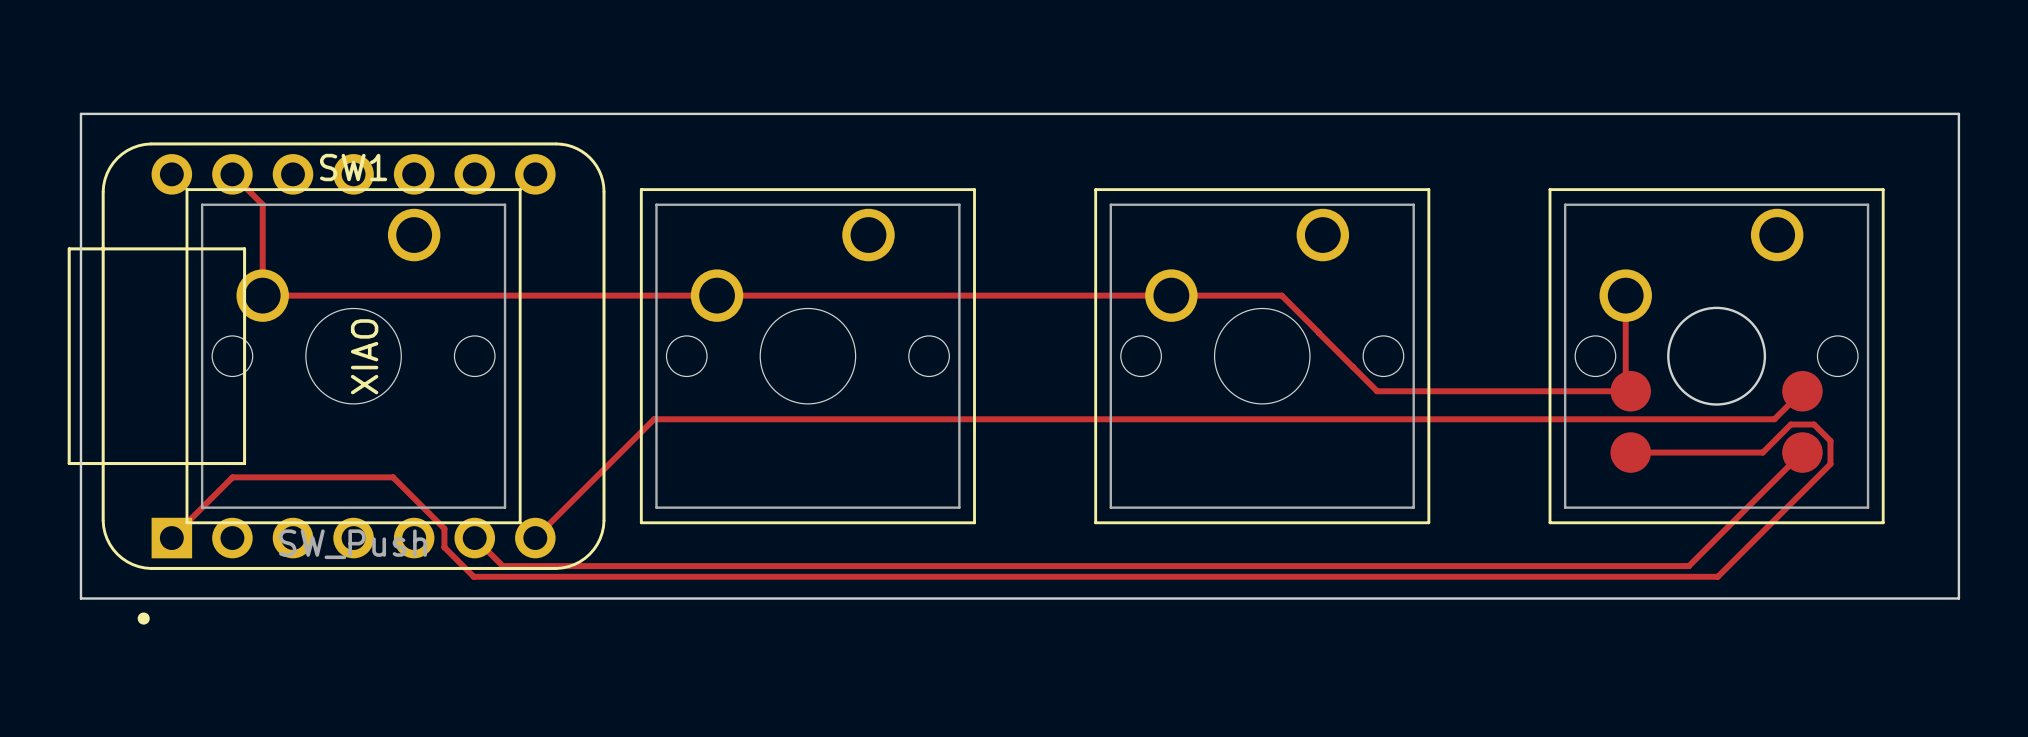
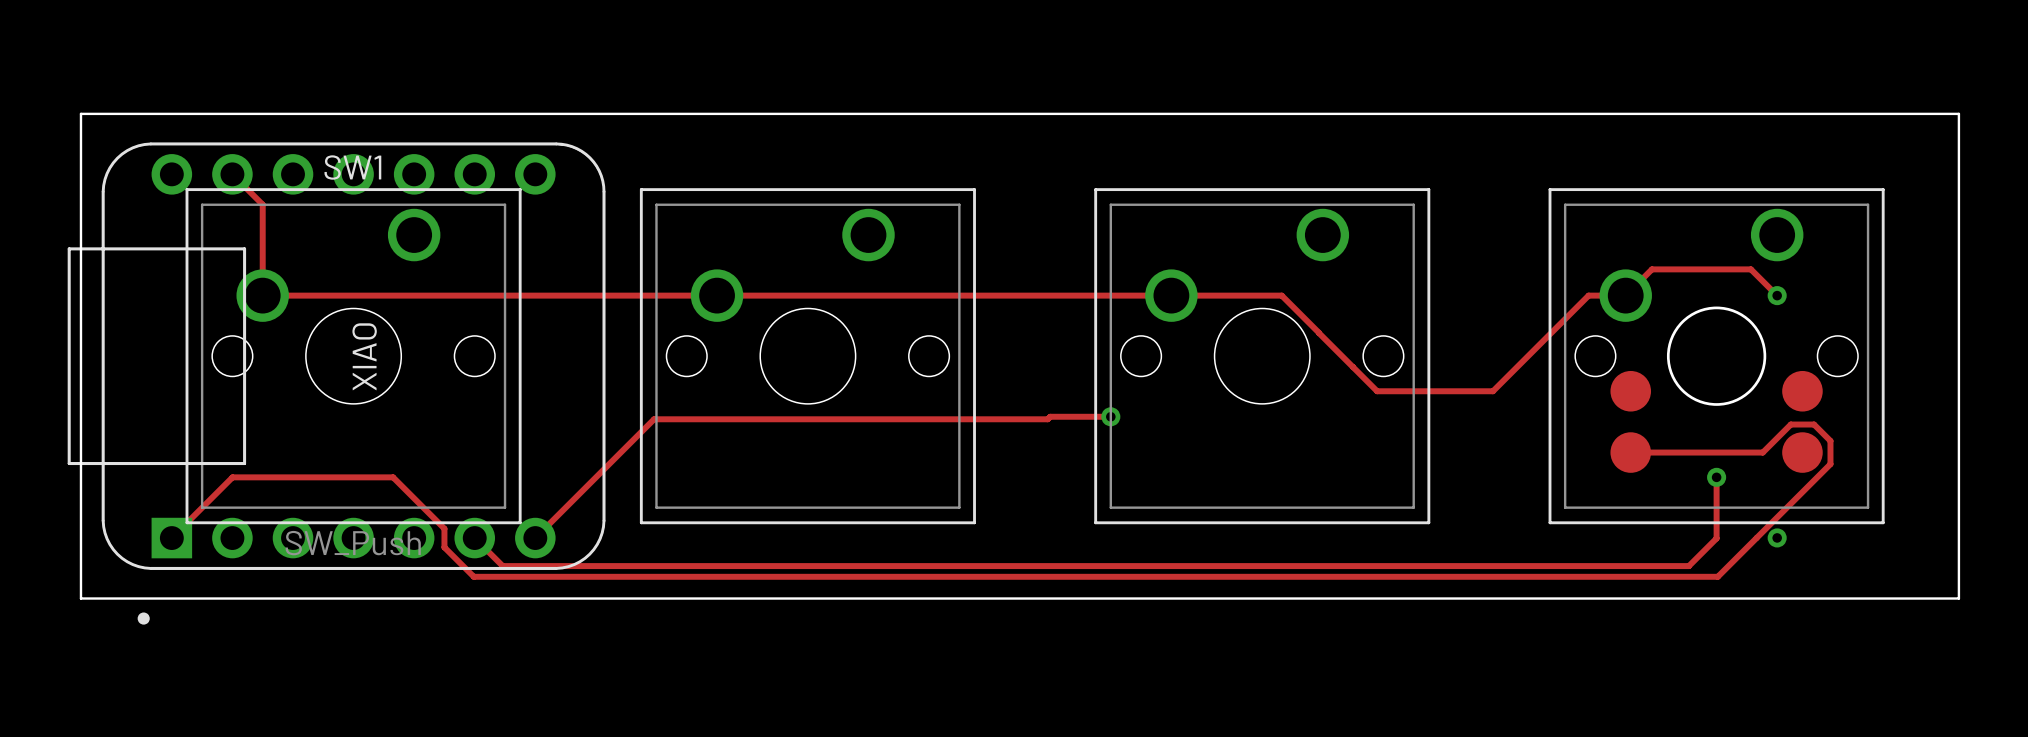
track: (1625, 295) (1625, 386) (1630, 391) (1492, 391) -> (1777, 295) (1750, 269) (1651, 269) (1625, 295) (1588, 295) (1492, 391)
via: none -> (1777, 295)
track: (1802, 391) (1774, 419) (1047, 419) -> (1110, 416) (1050, 416) (1047, 419)
via: none -> (1110, 416)
track: (1802, 452) (1716, 538) -> (1716, 477) (1716, 538)
via: none -> (1716, 477)
via: none -> (1777, 537)

